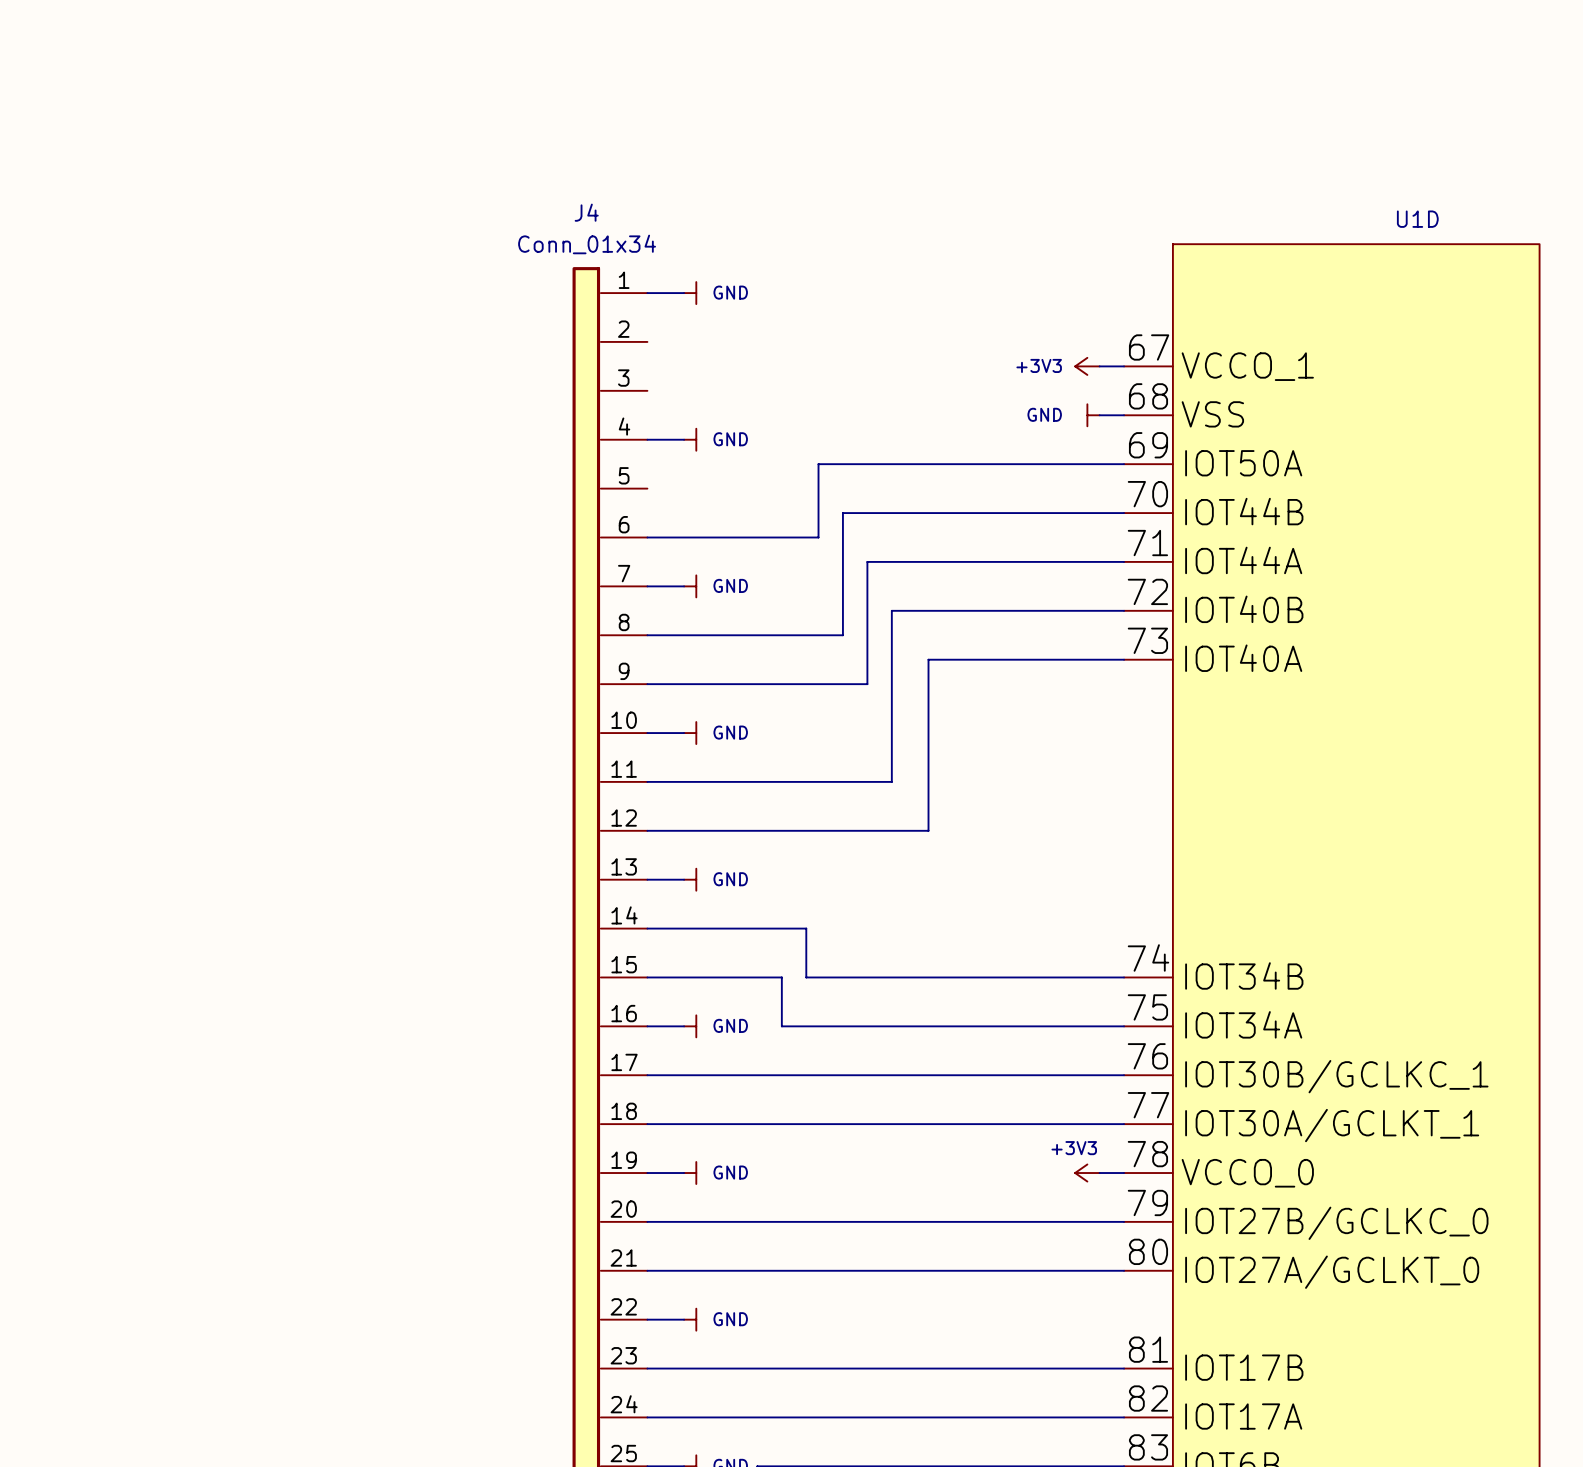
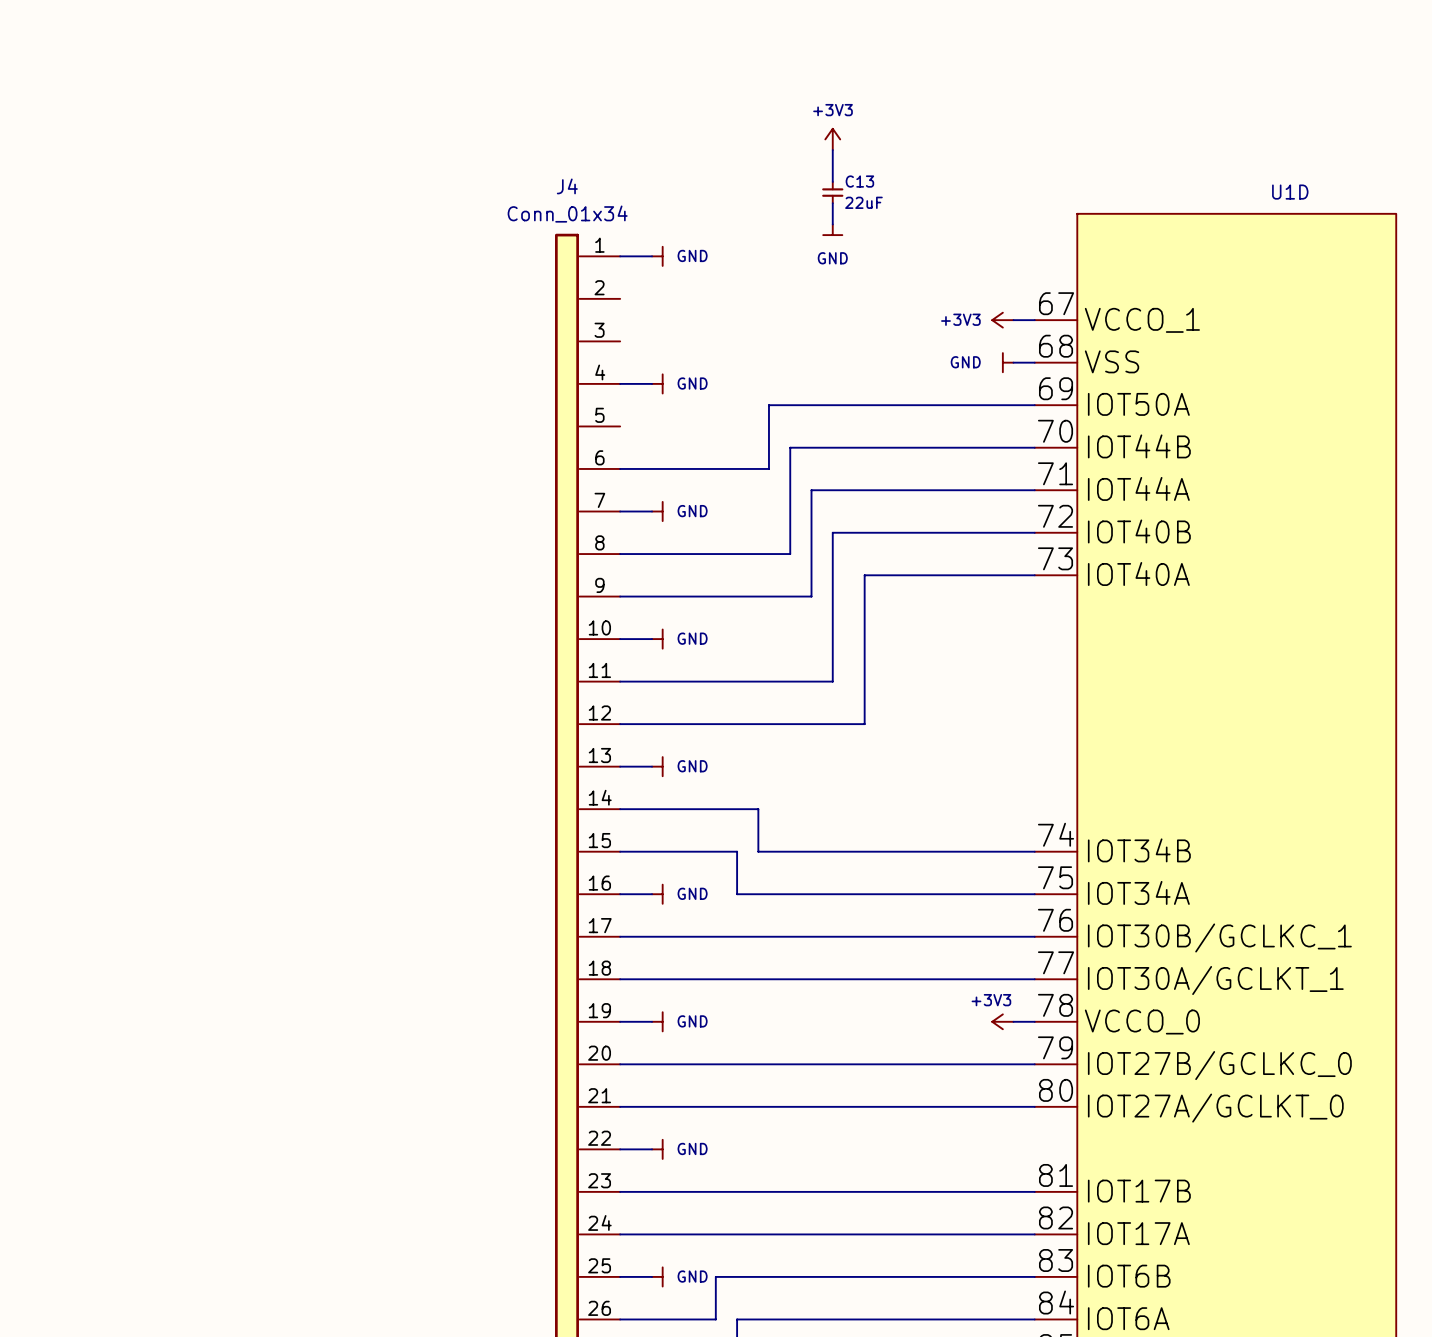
power symbol: none -> +3V3 (832, 139)
wire: none -> (832, 150) (832, 181)
C13: none -> 22uF (832, 192)
wire: none -> (832, 203) (832, 224)
power symbol: none -> GND (832, 229)

